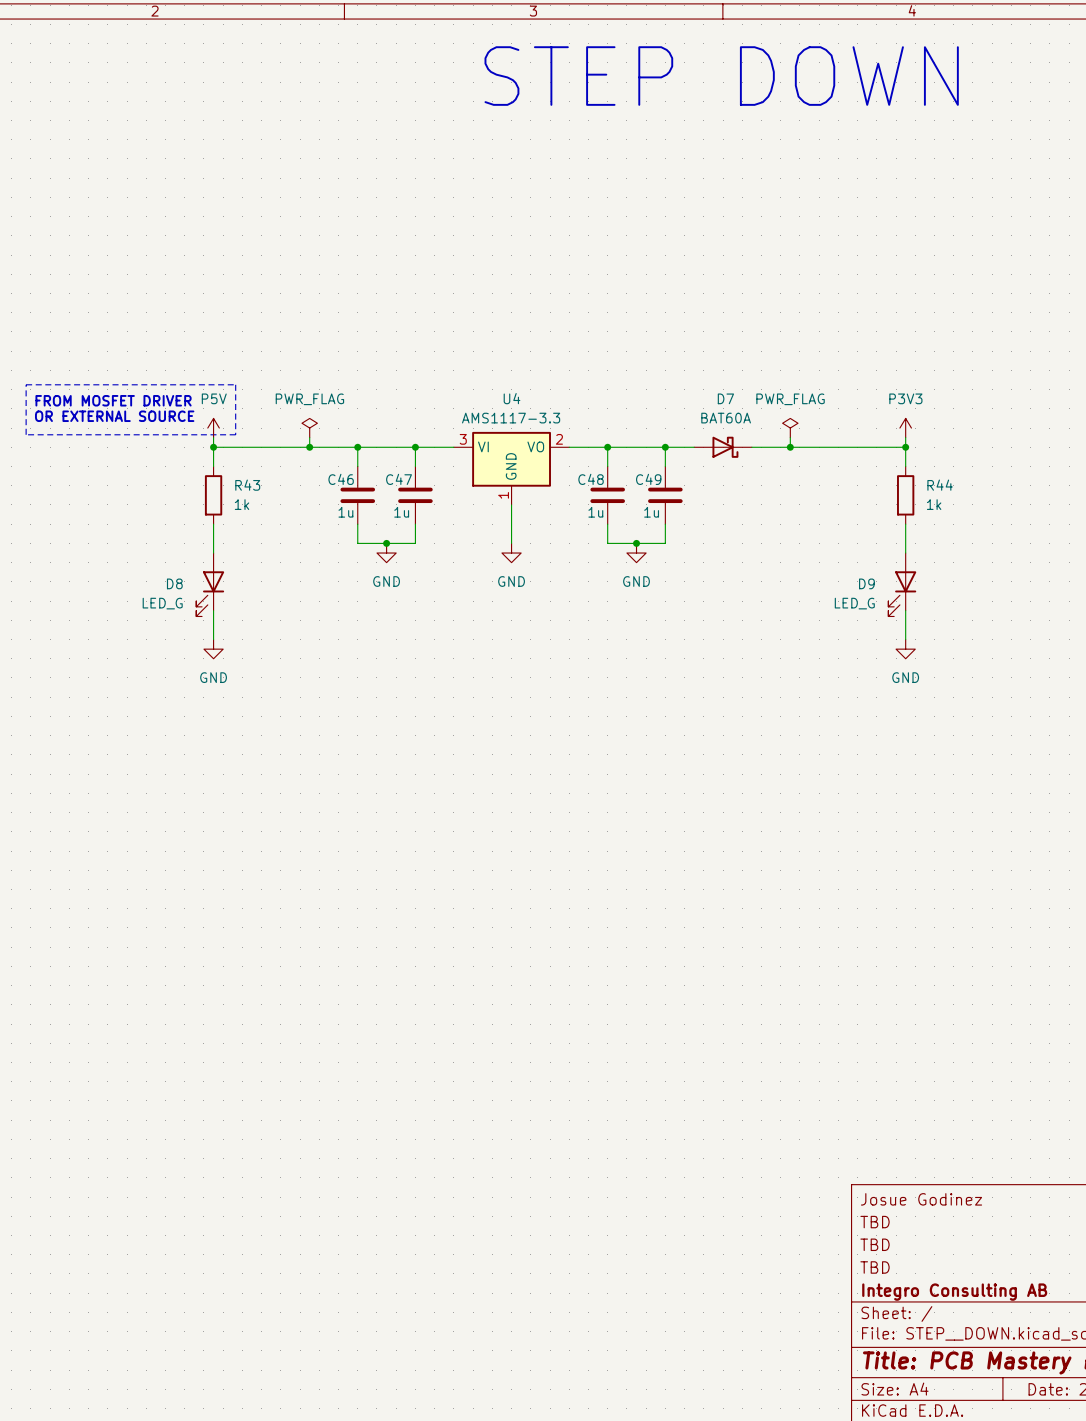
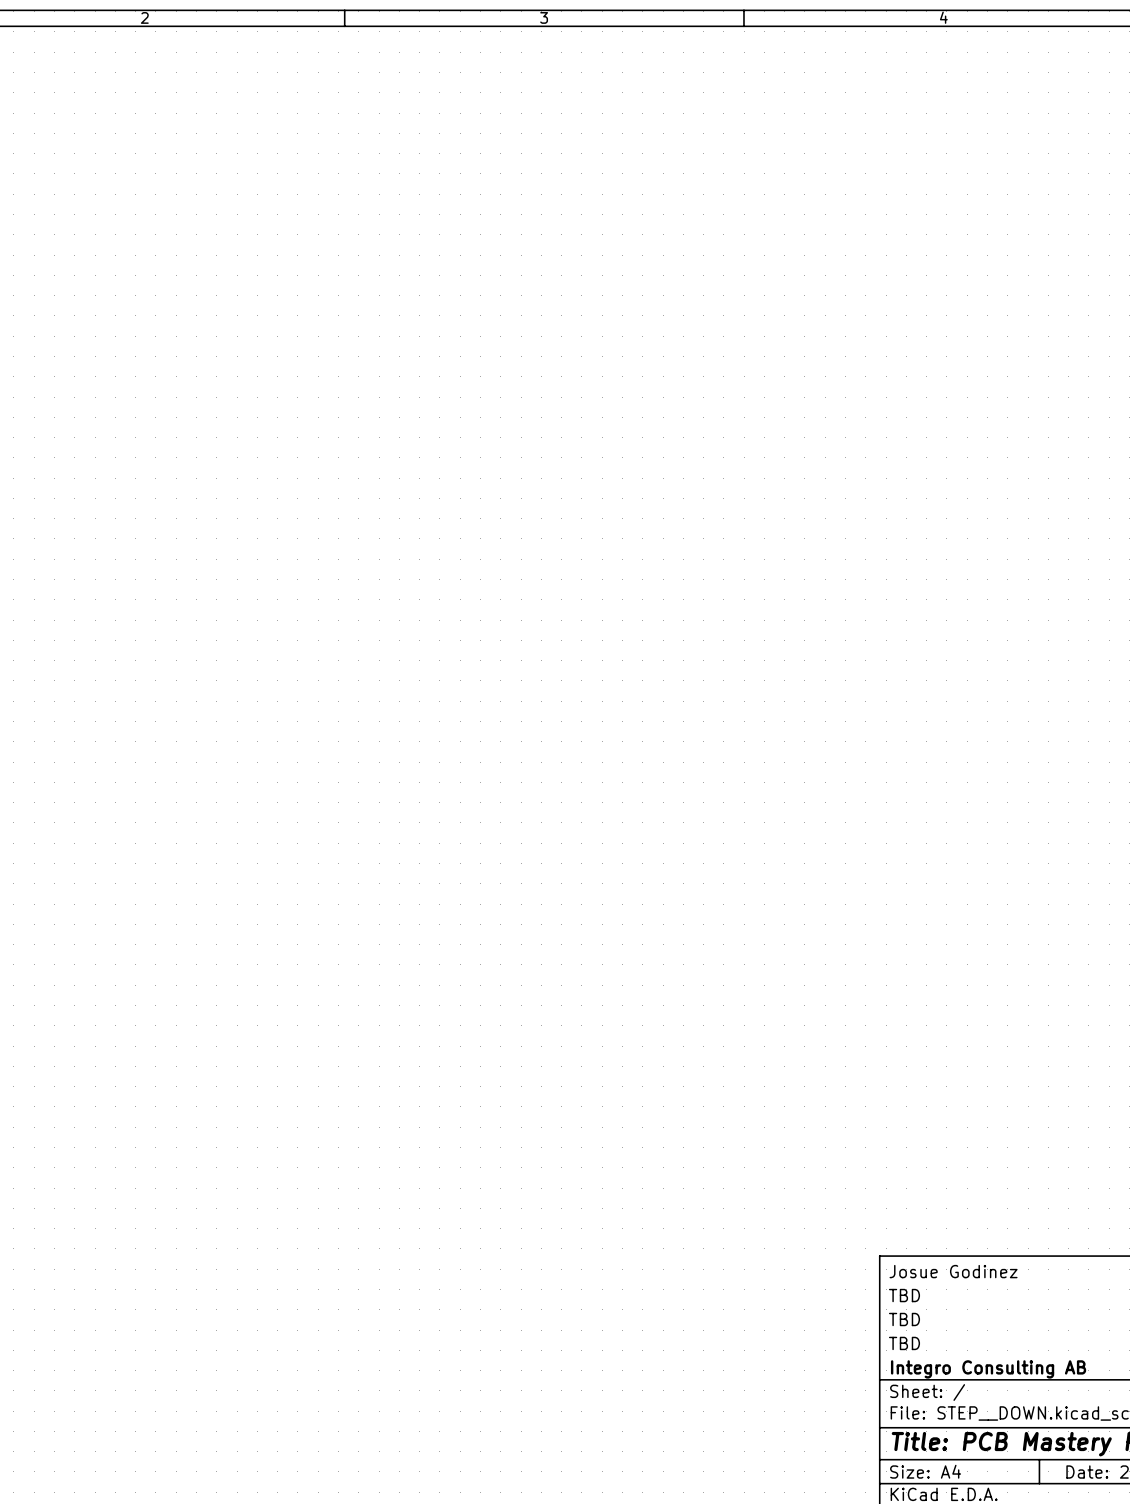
text: STEP DOWN (721, 76) -> none
line: (26, 384) (235, 384) (235, 434) (26, 434) (26, 384) -> none
text: FROM MOSFET DRIVER (113, 400) -> none
text: OR EXTERNAL SOURCE (114, 416) -> none
power symbol: P5V (213, 428) -> none
power symbol: PWR_FLAG (309, 428) -> none
power symbol: PWR_FLAG (790, 428) -> none
power symbol: P3V3 (905, 428) -> none
wire: (213, 437) (213, 466) -> none
wire: (309, 437) (309, 447) -> none
wire: (790, 437) (790, 447) -> none
wire: (905, 437) (905, 466) -> none
wire: (213, 447) (453, 447) -> none
junction: (213, 447) -> none
junction: (309, 447) -> none
wire: (357, 447) (357, 466) -> none
junction: (357, 447) -> none
wire: (415, 447) (415, 466) -> none
junction: (415, 447) -> none
wire: (569, 447) (694, 447) -> none
wire: (607, 447) (607, 466) -> none
junction: (607, 447) -> none
wire: (665, 447) (665, 466) -> none
junction: (665, 447) -> none
D7: BAT60A (723, 447) -> none
wire: (751, 447) (905, 447) -> none
junction: (790, 447) -> none
junction: (905, 447) -> none
U4: AMS1117-3.3 (511, 468) -> none
R43: 1k (213, 495) -> none
C46: 1u (357, 495) -> none
C47: 1u (415, 495) -> none
C48: 1u (607, 495) -> none
C49: 1u (665, 495) -> none
R44: 1k (905, 495) -> none
wire: (511, 504) (511, 543) -> none
wire: (213, 524) (213, 553) -> none
wire: (357, 524) (357, 543) (415, 543) (415, 524) -> none
wire: (607, 524) (607, 543) (665, 543) (665, 524) -> none
wire: (905, 524) (905, 553) -> none
junction: (386, 543) -> none
junction: (636, 543) -> none
power symbol: GND (386, 553) -> none
power symbol: GND (511, 553) -> none
power symbol: GND (636, 553) -> none
D8: LED_G (210, 584) -> none
D9: LED_G (902, 584) -> none
wire: (213, 610) (213, 639) -> none
wire: (905, 610) (905, 639) -> none
power symbol: GND (213, 649) -> none
power symbol: GND (905, 649) -> none

